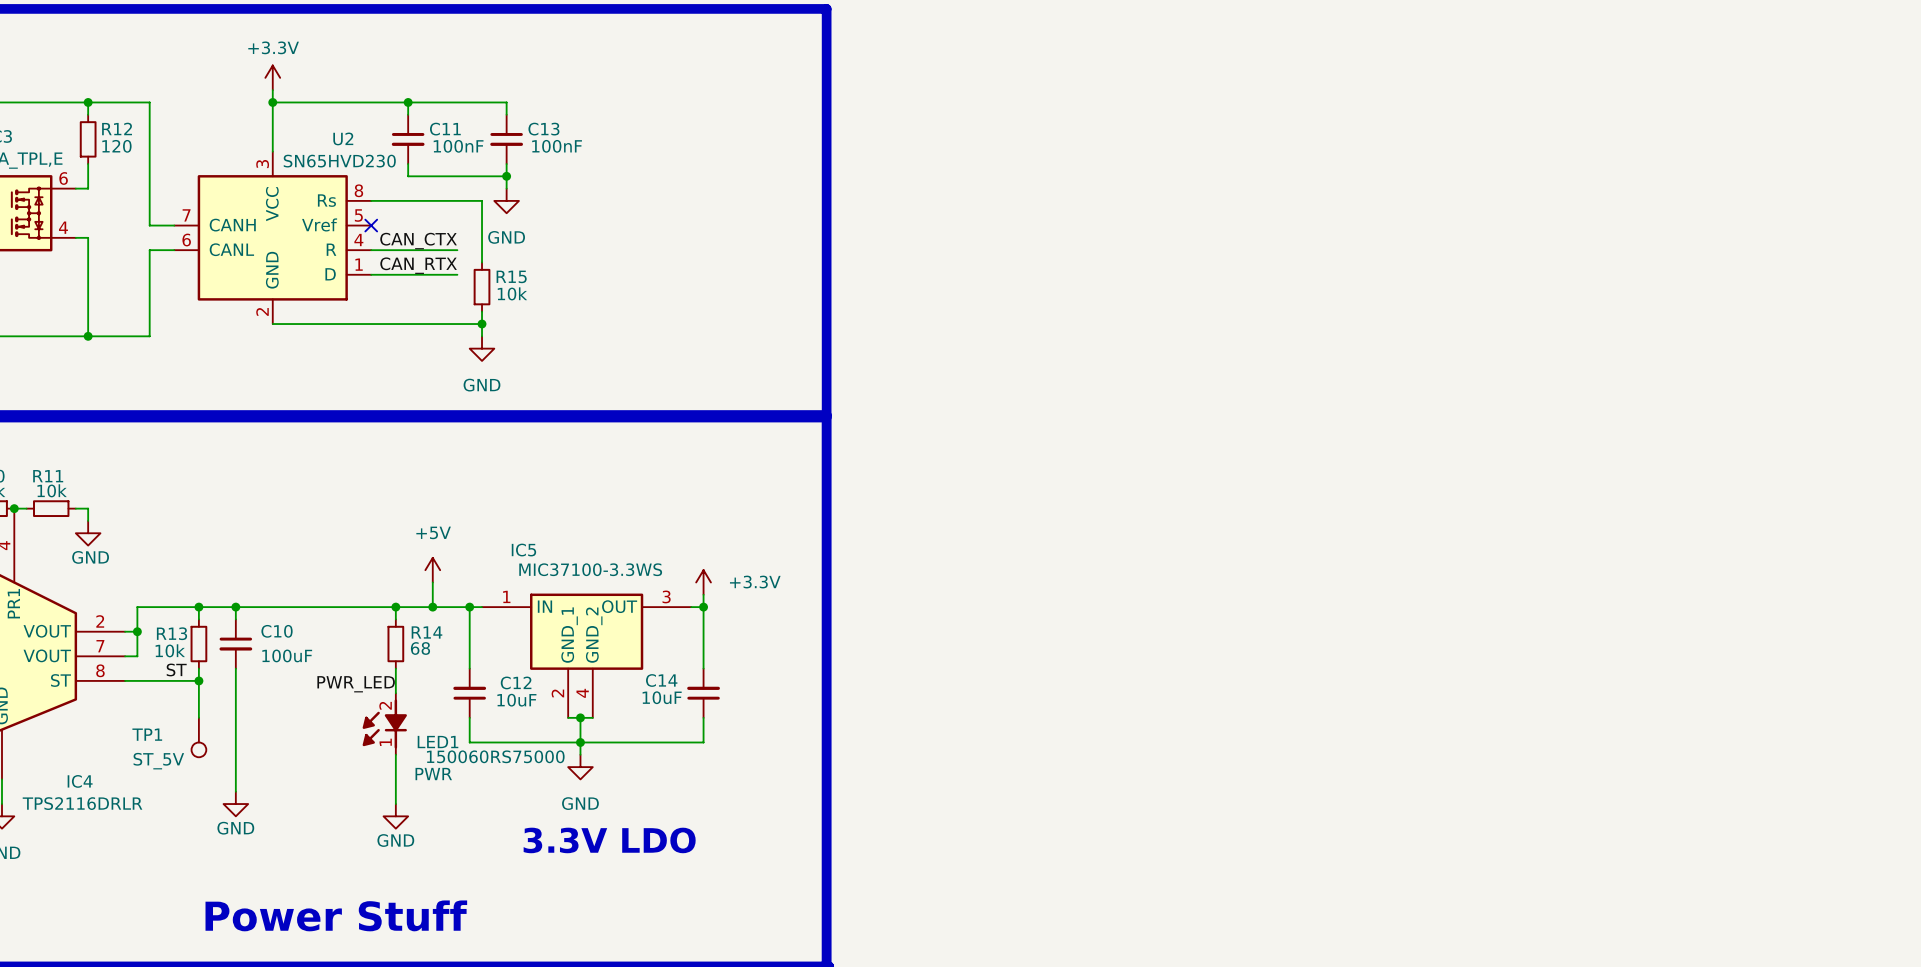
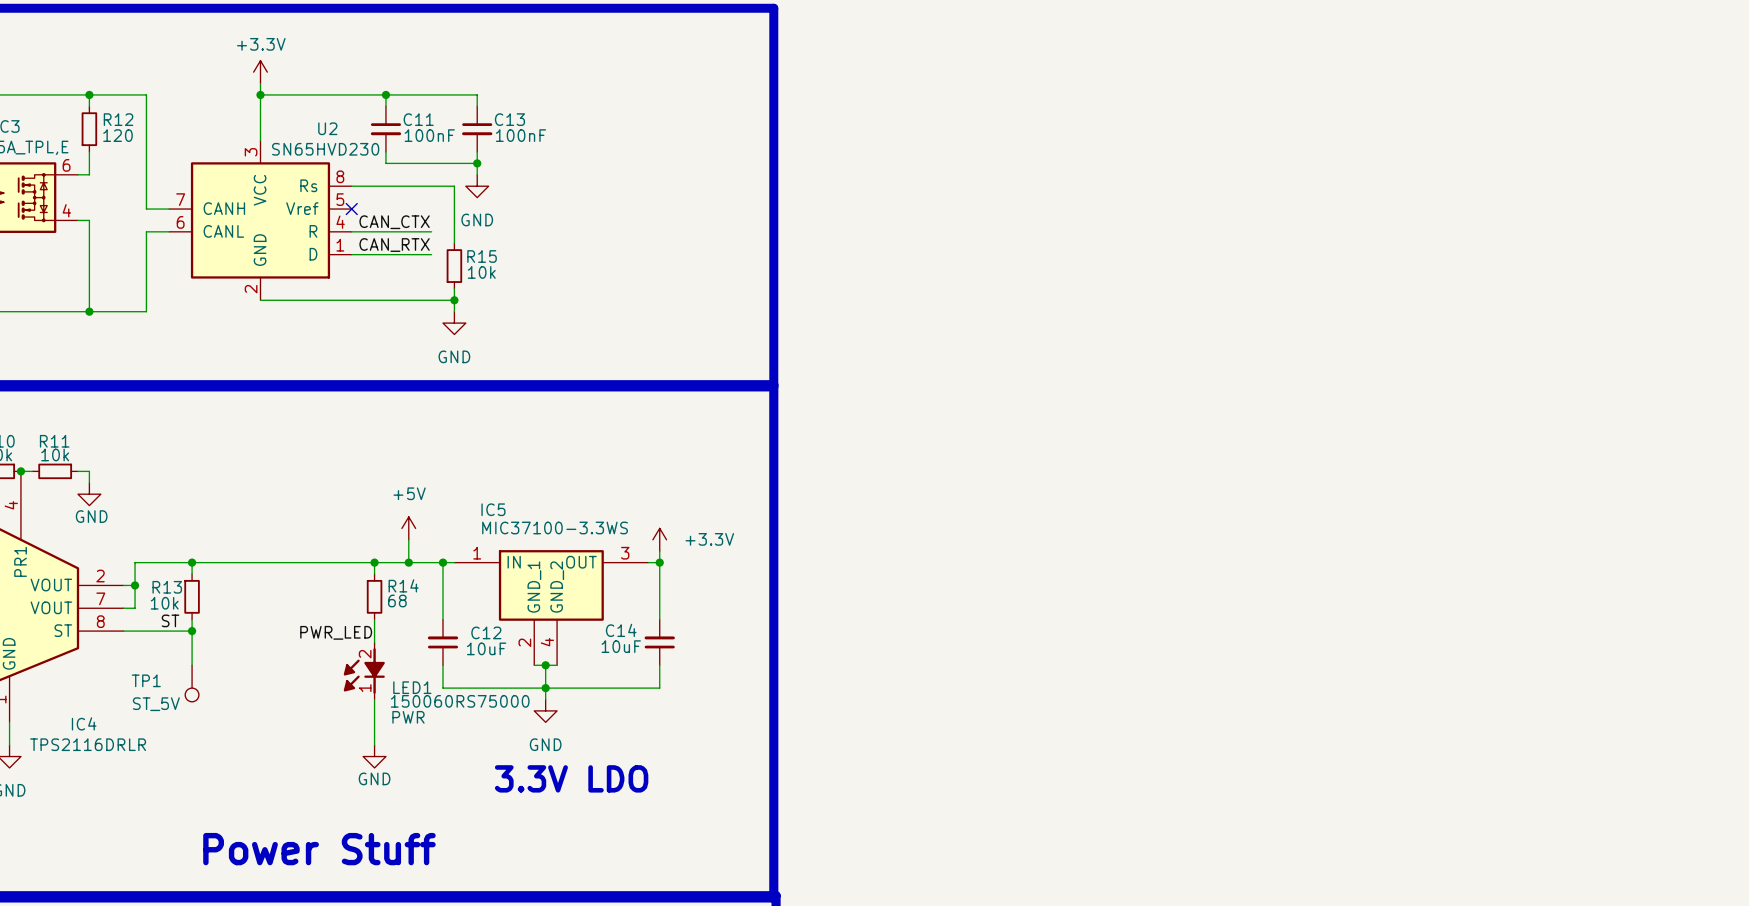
wire: (235, 607) (235, 619) -> none
junction: (235, 607) -> none
C10: 100uF (235, 644) -> none
wire: (235, 668) (235, 791) -> none
power symbol: GND (235, 804) -> none

